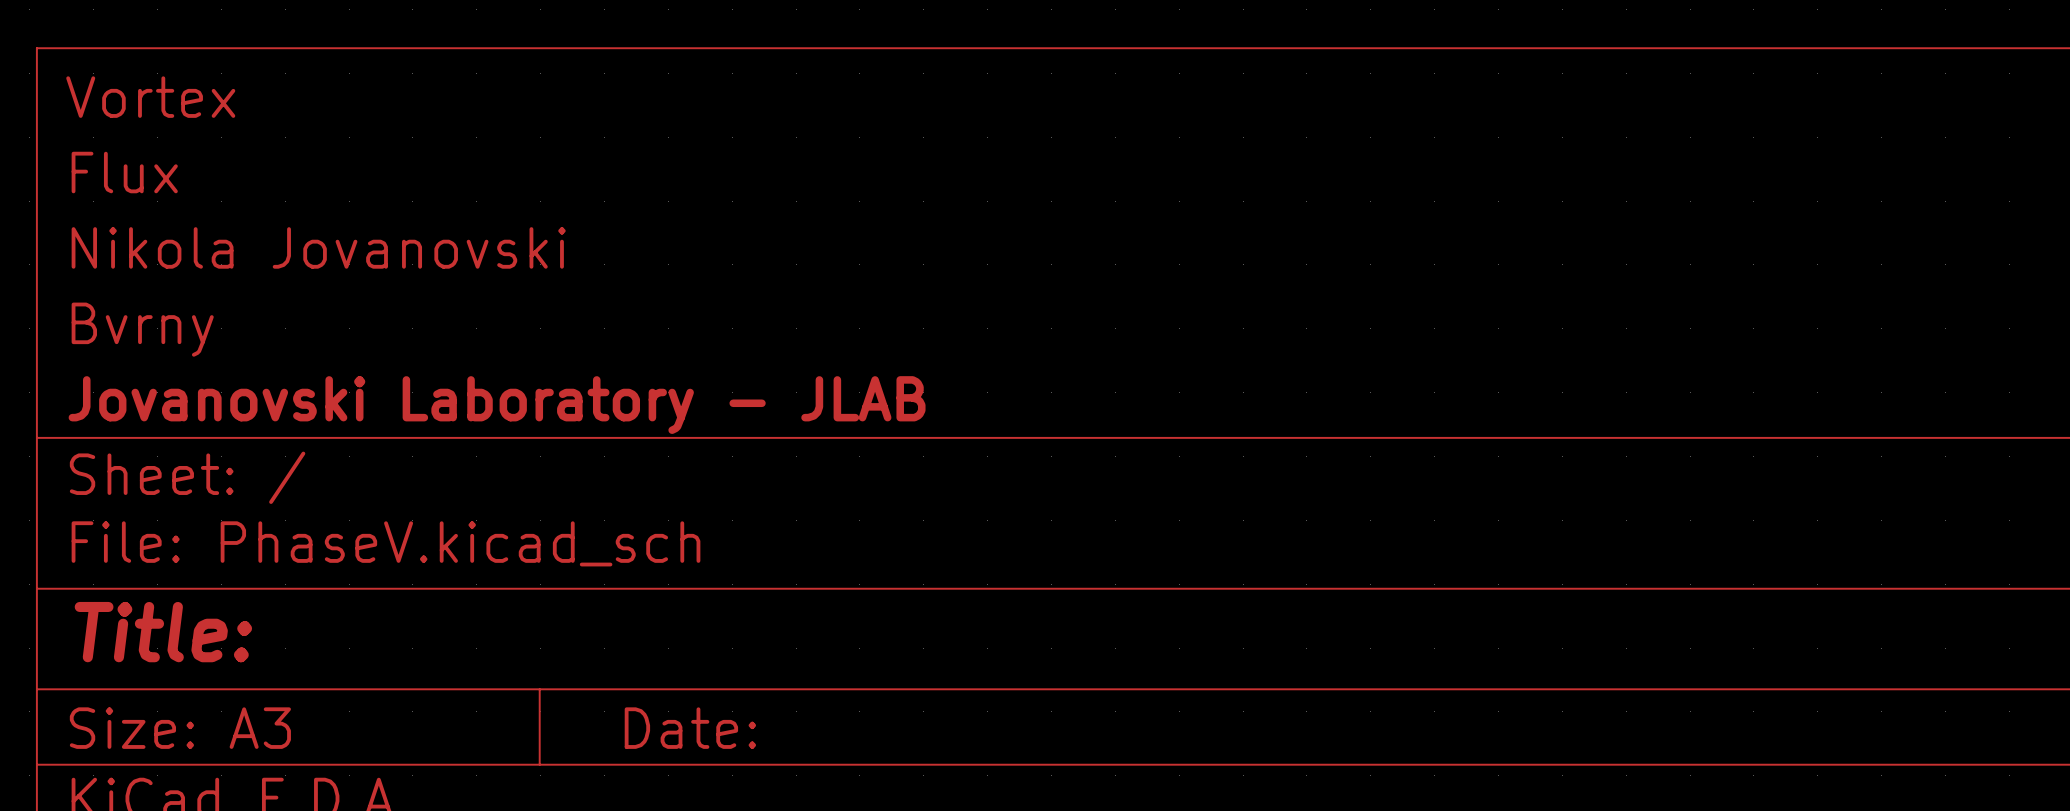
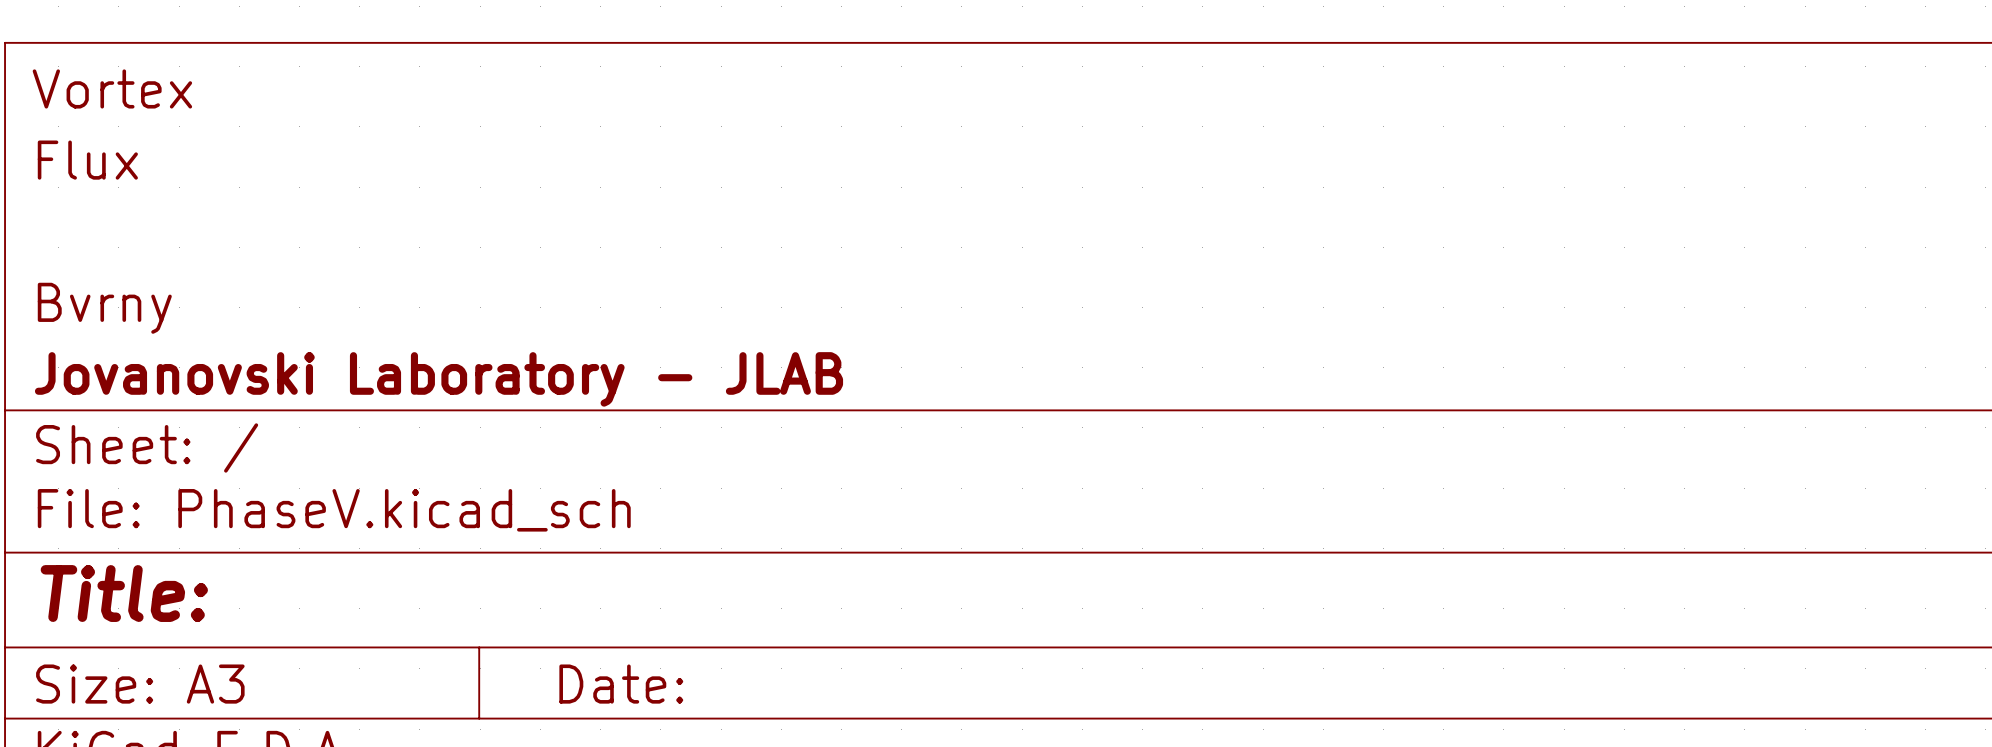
title block: Nikola Jovanovski (318, 247) -> none

